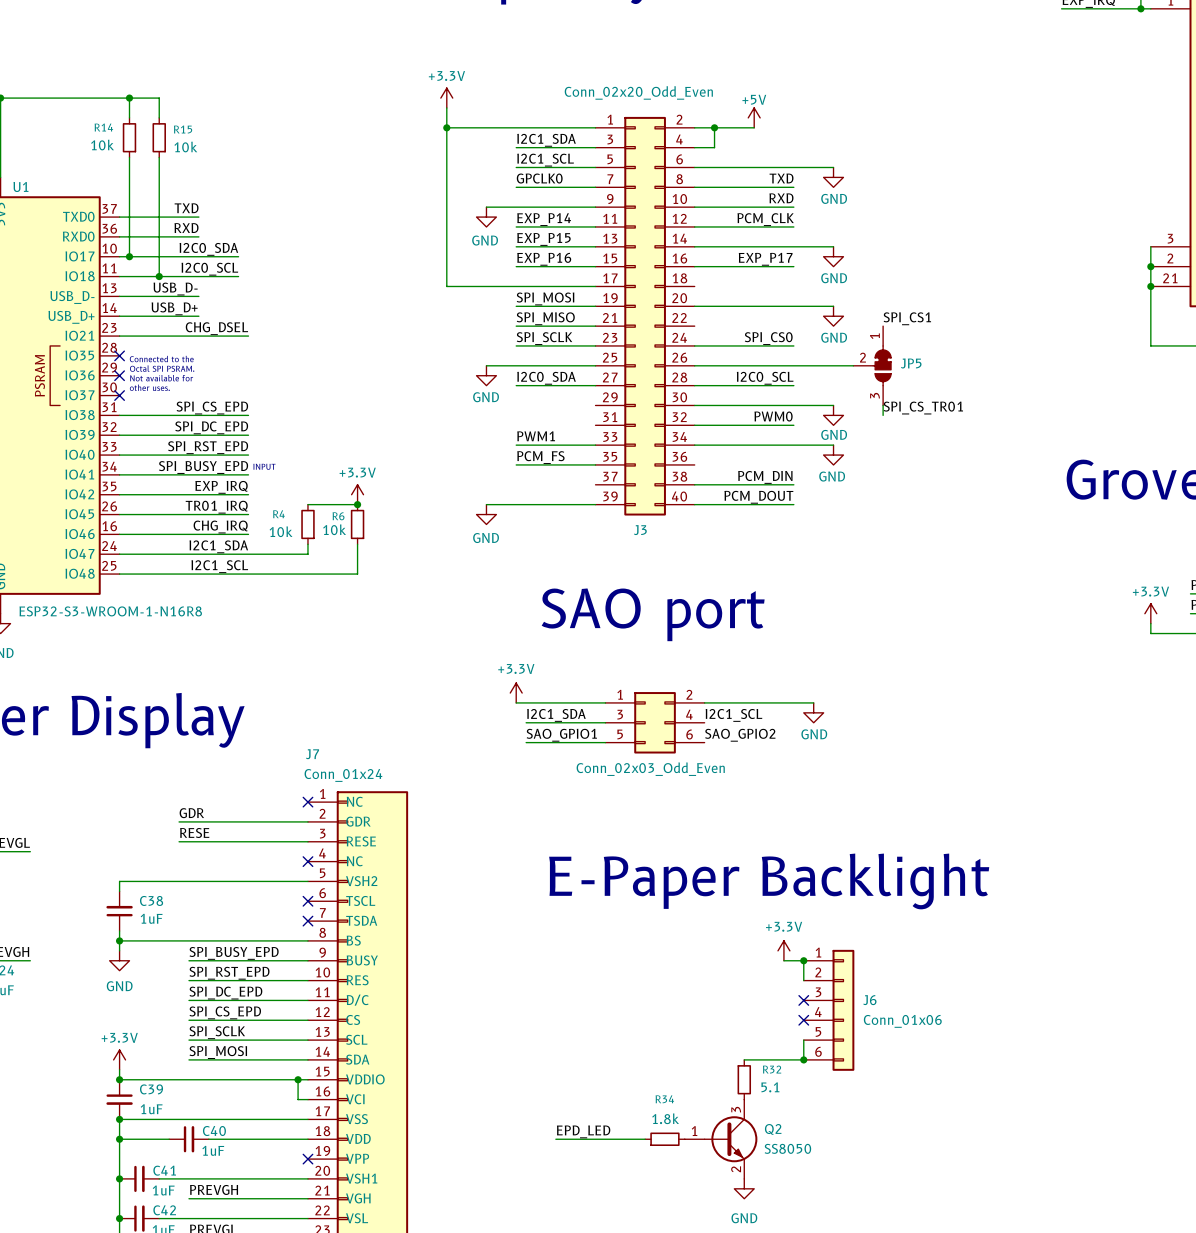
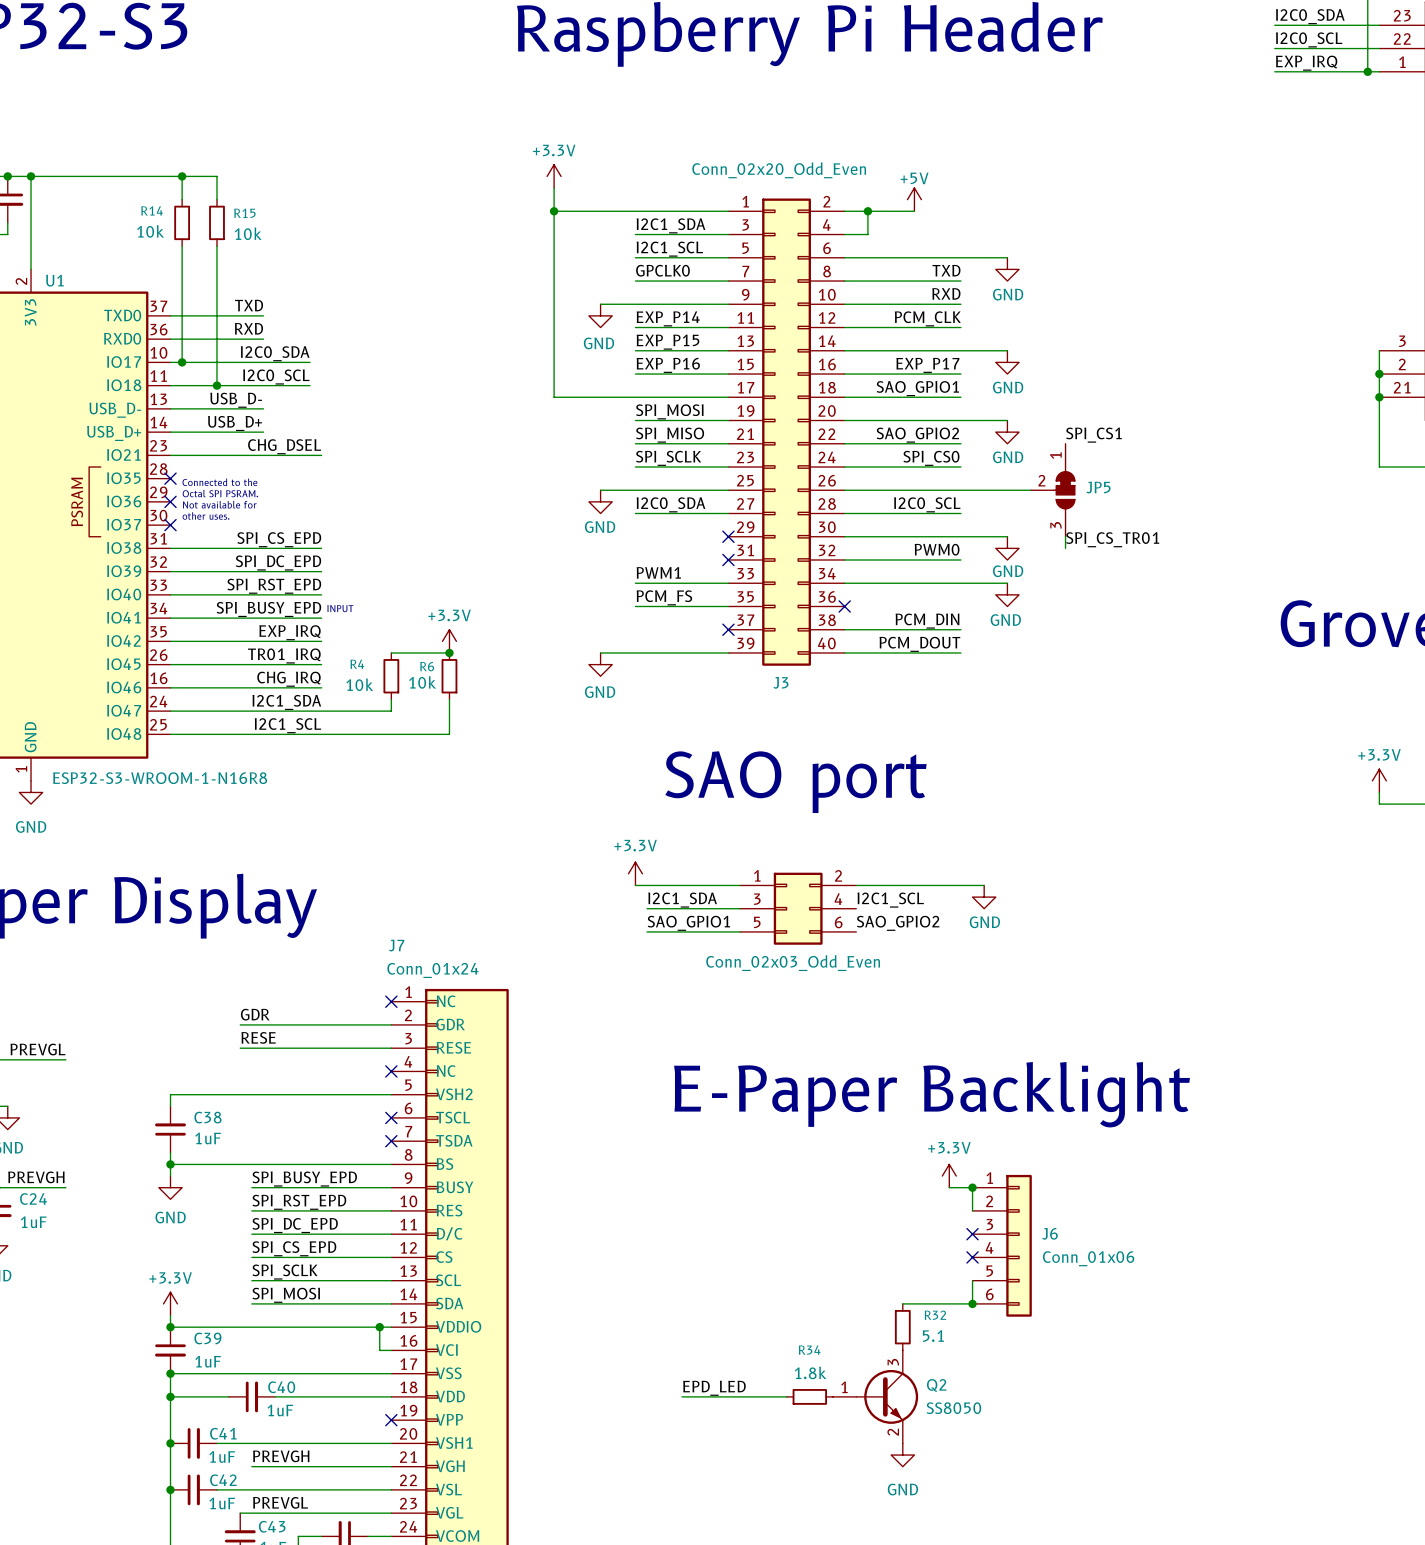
label: none -> SAO_GPIO1 (917, 388)
wire: none -> (844, 397) (960, 397)
label: none -> SAO_GPIO2 (917, 435)
wire: none -> (844, 443) (960, 443)
no-connect mark: none -> (728, 536)
no-connect mark: none -> (728, 559)
no-connect mark: none -> (844, 606)
no-connect mark: none -> (728, 629)

